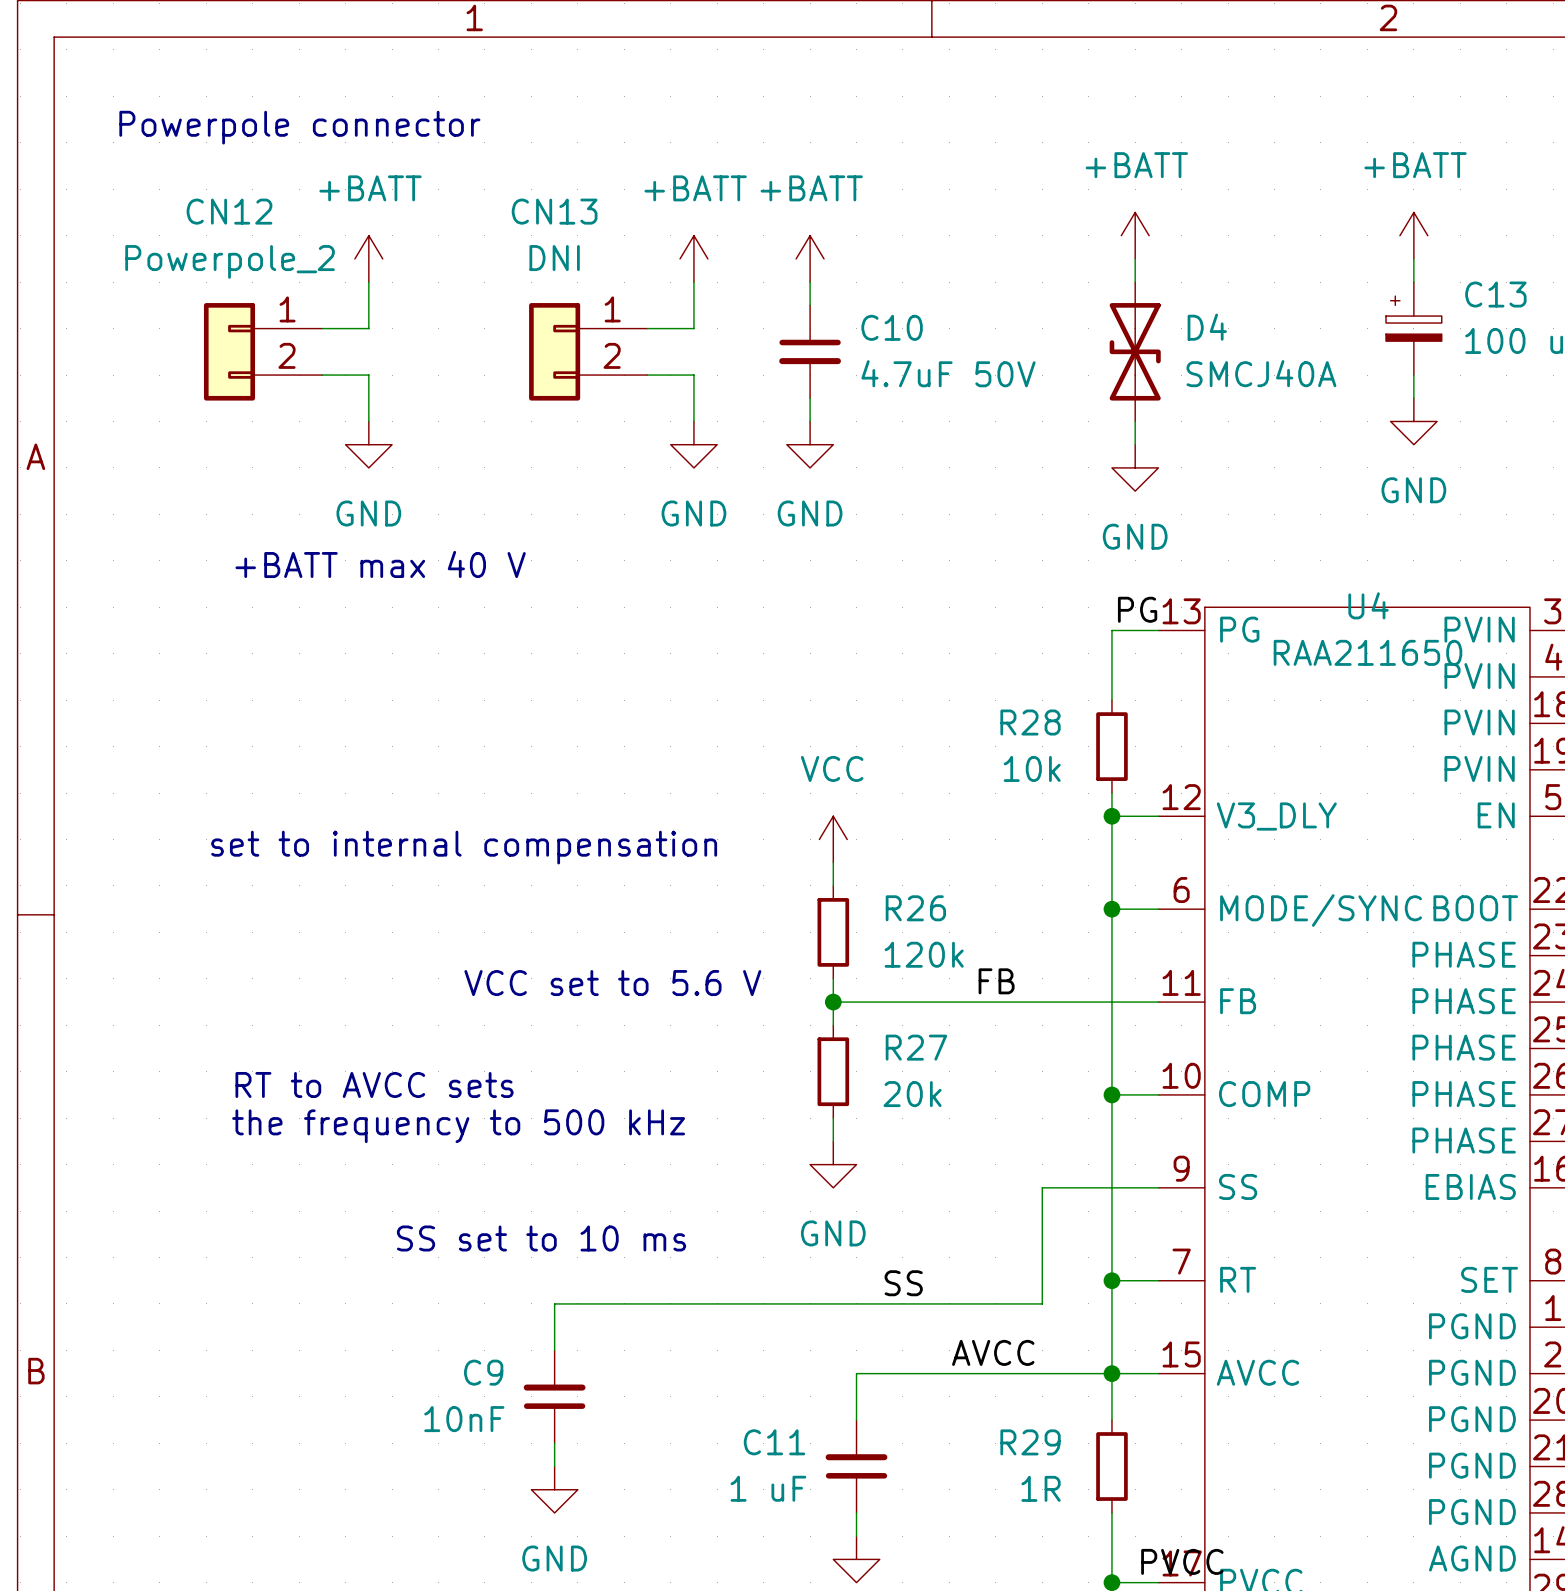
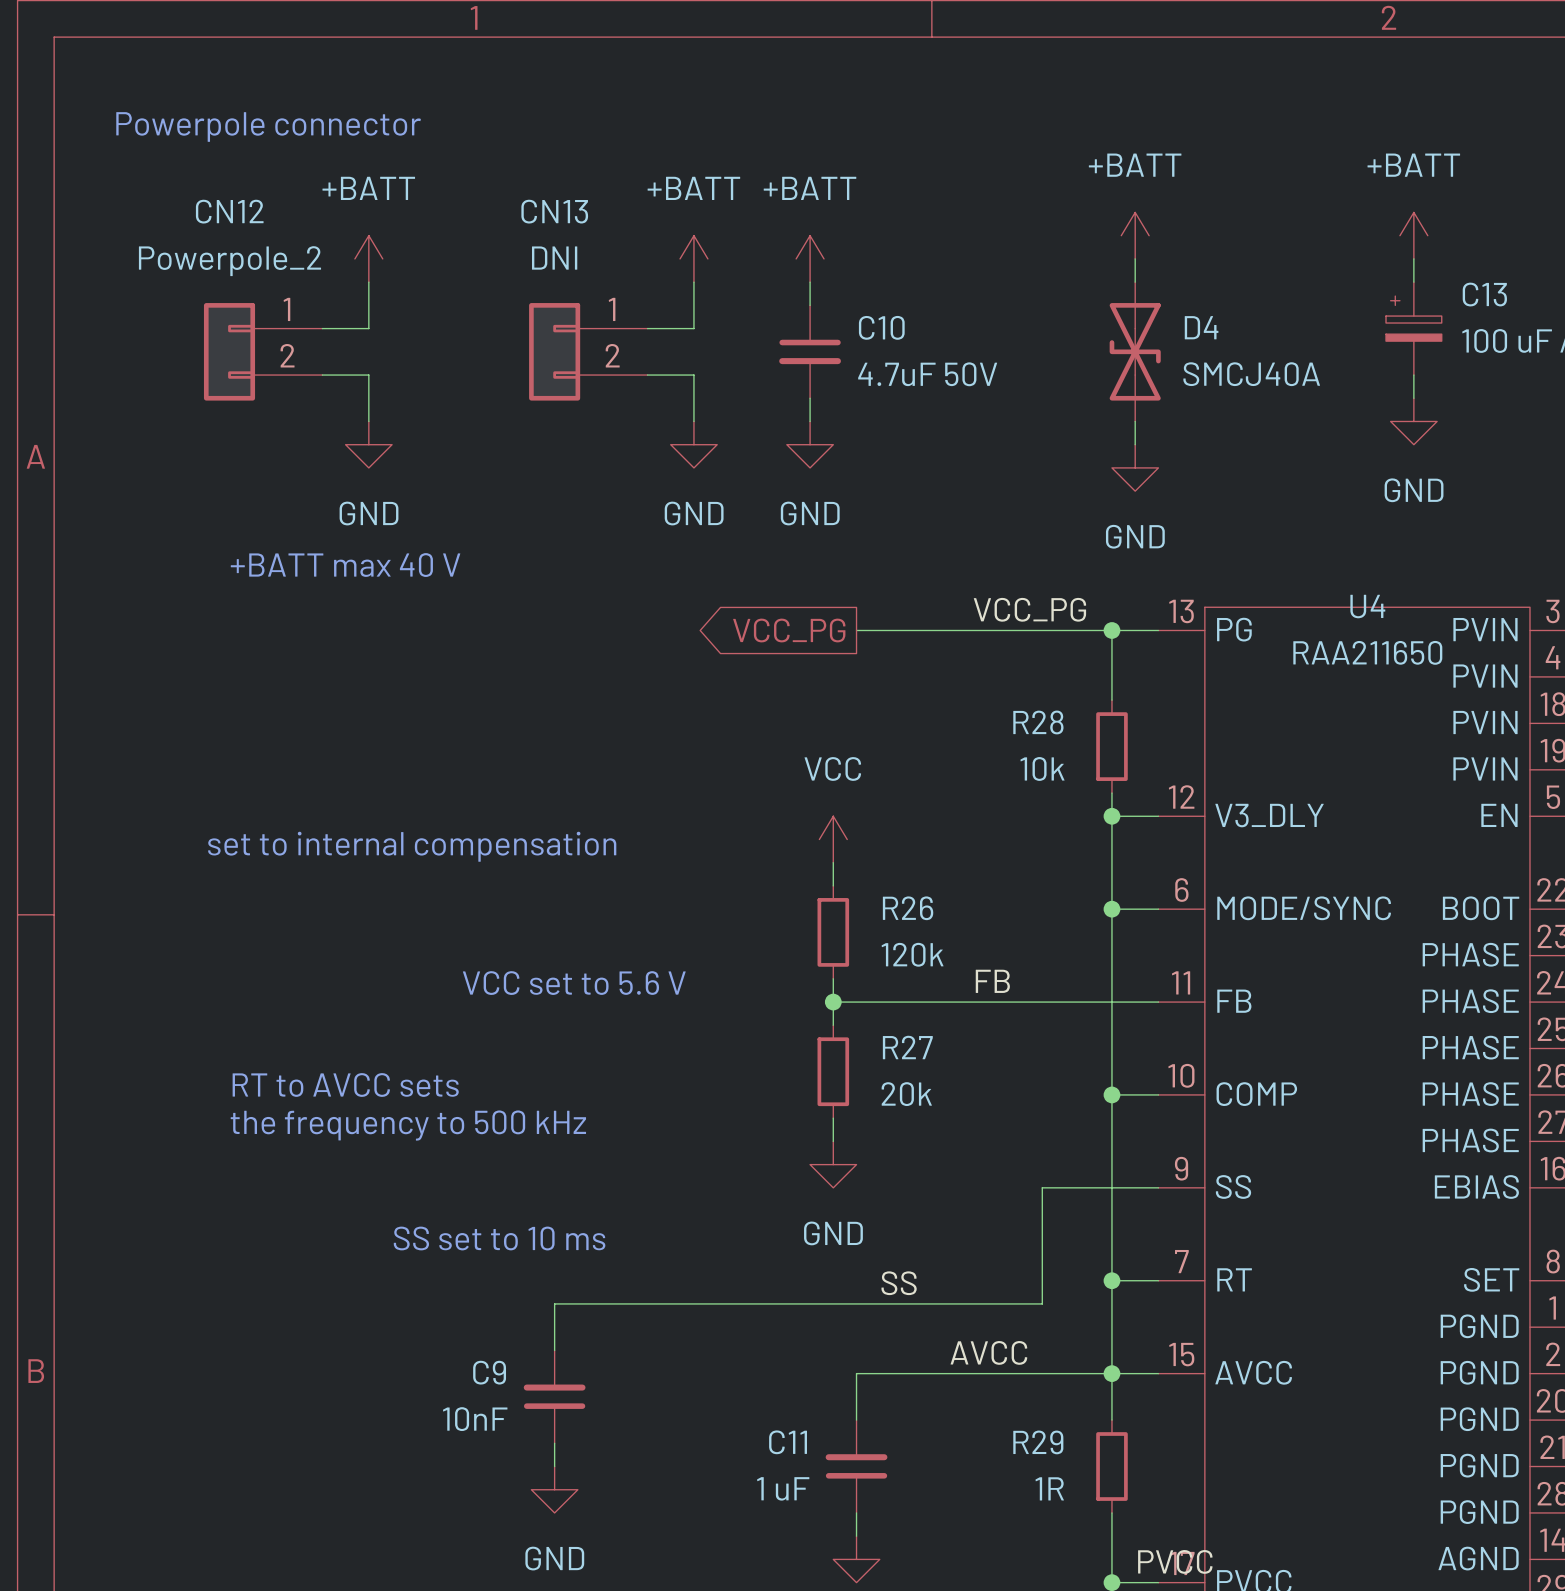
label: PG (1137, 609) -> none
label: none -> VCC_PG (1029, 609)
wire: none -> (856, 630) (1111, 630)
junction: none -> (1111, 630)
global label: none -> VCC_PG (789, 630)

